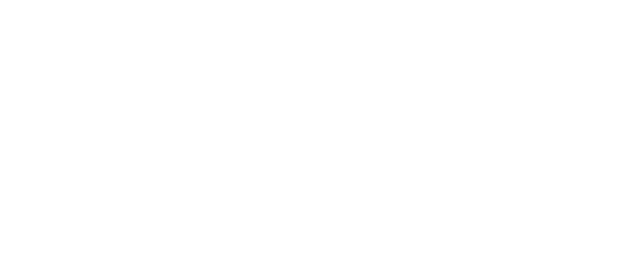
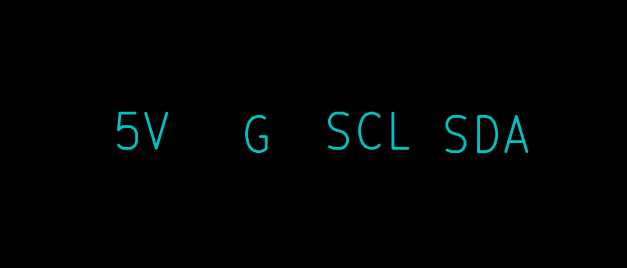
text: none -> SCL (368, 130)
text: none -> 5V (142, 130)
text: none -> G (256, 134)
text: none -> SDA (486, 134)

